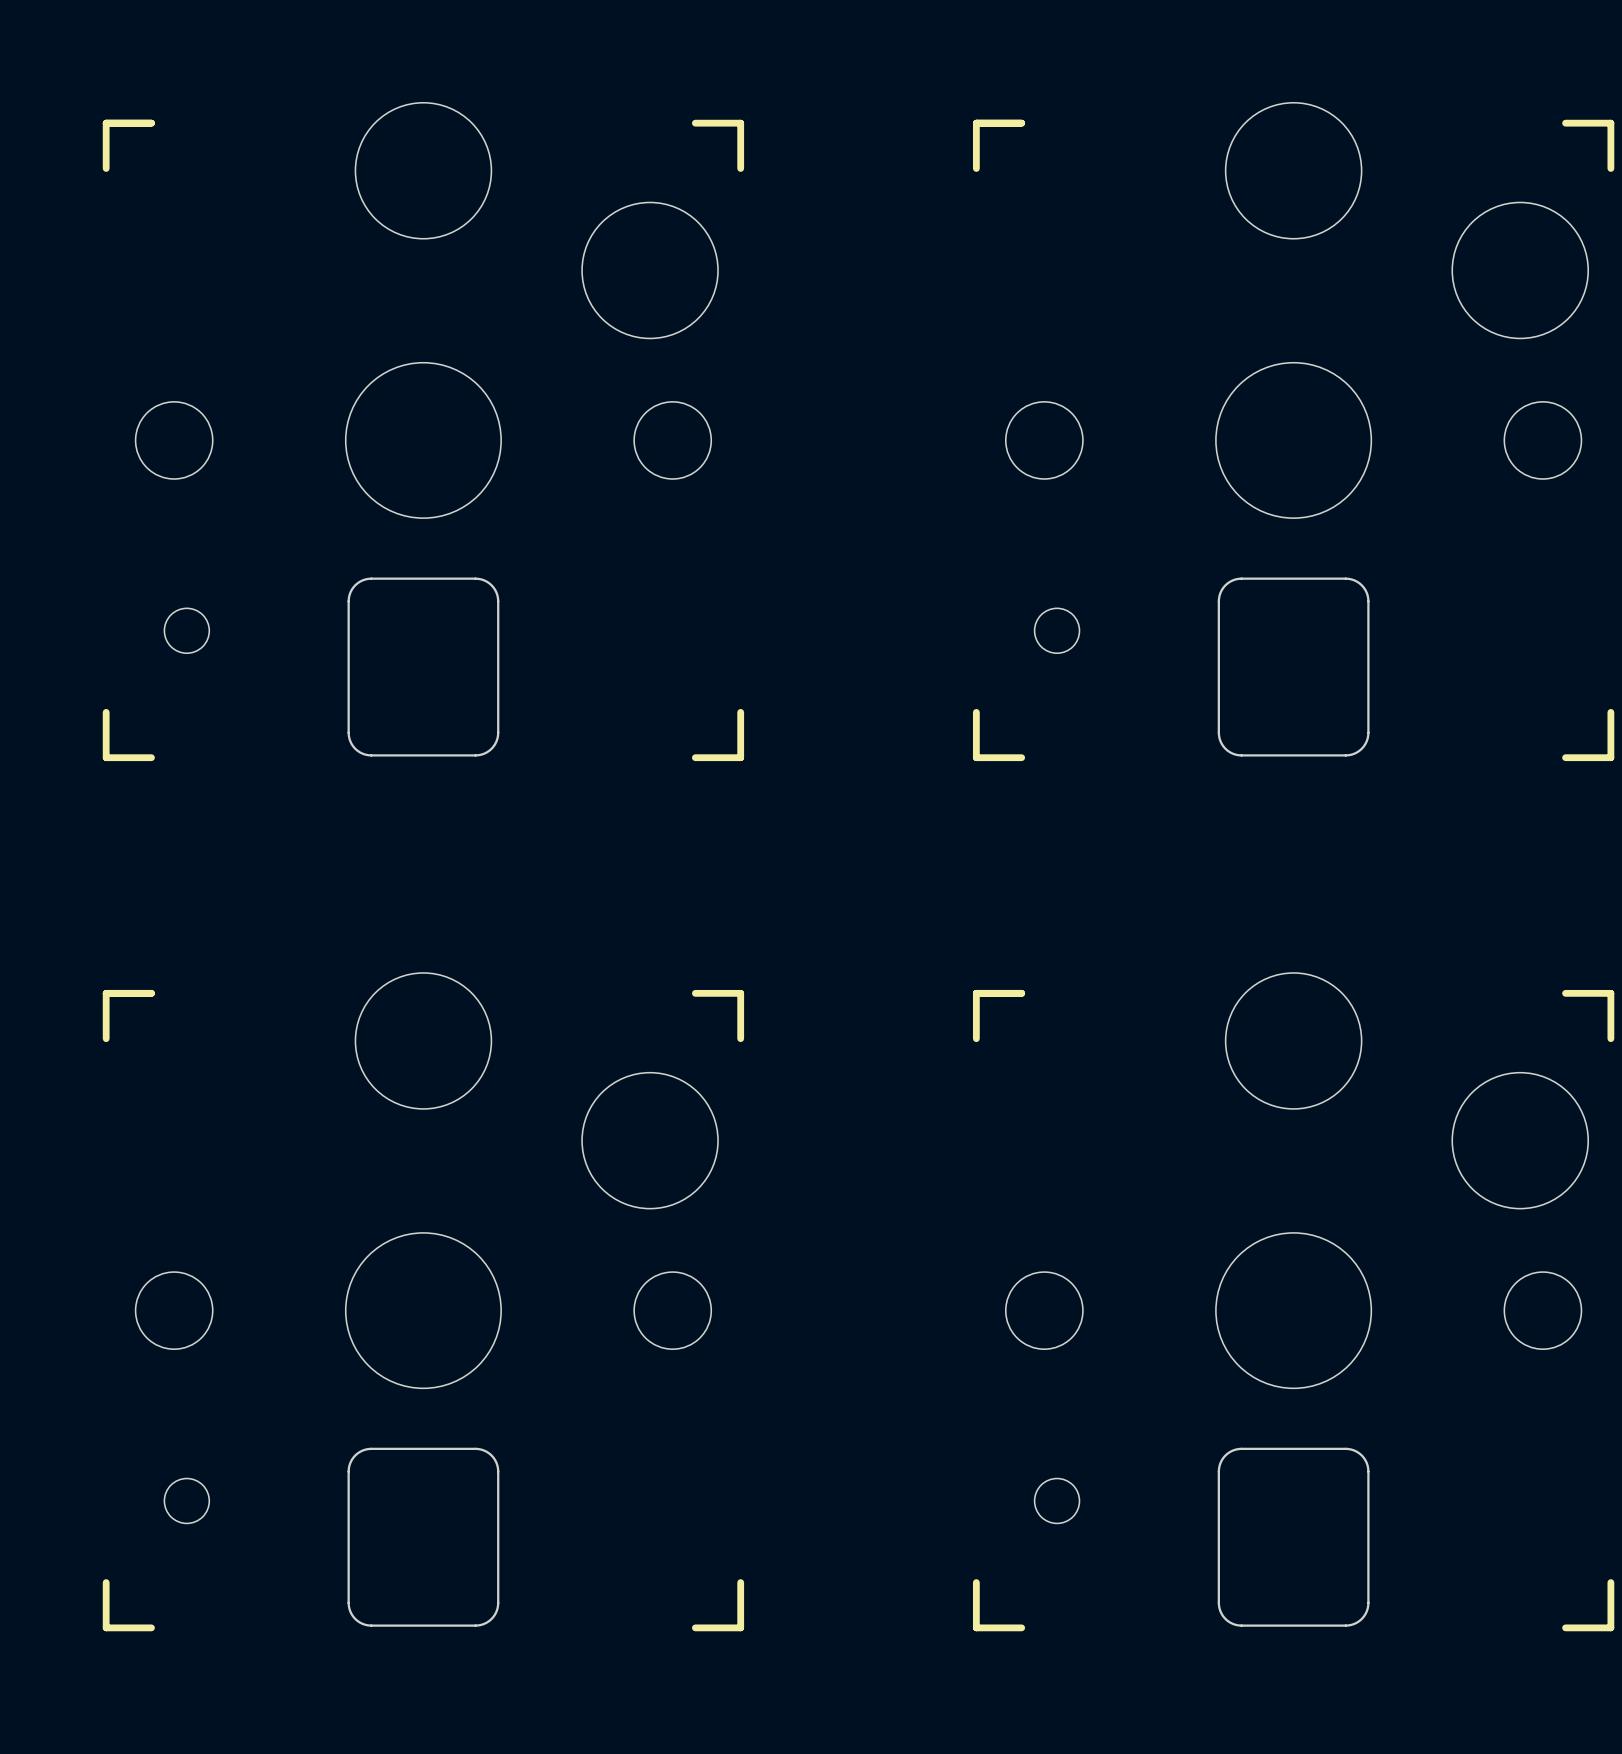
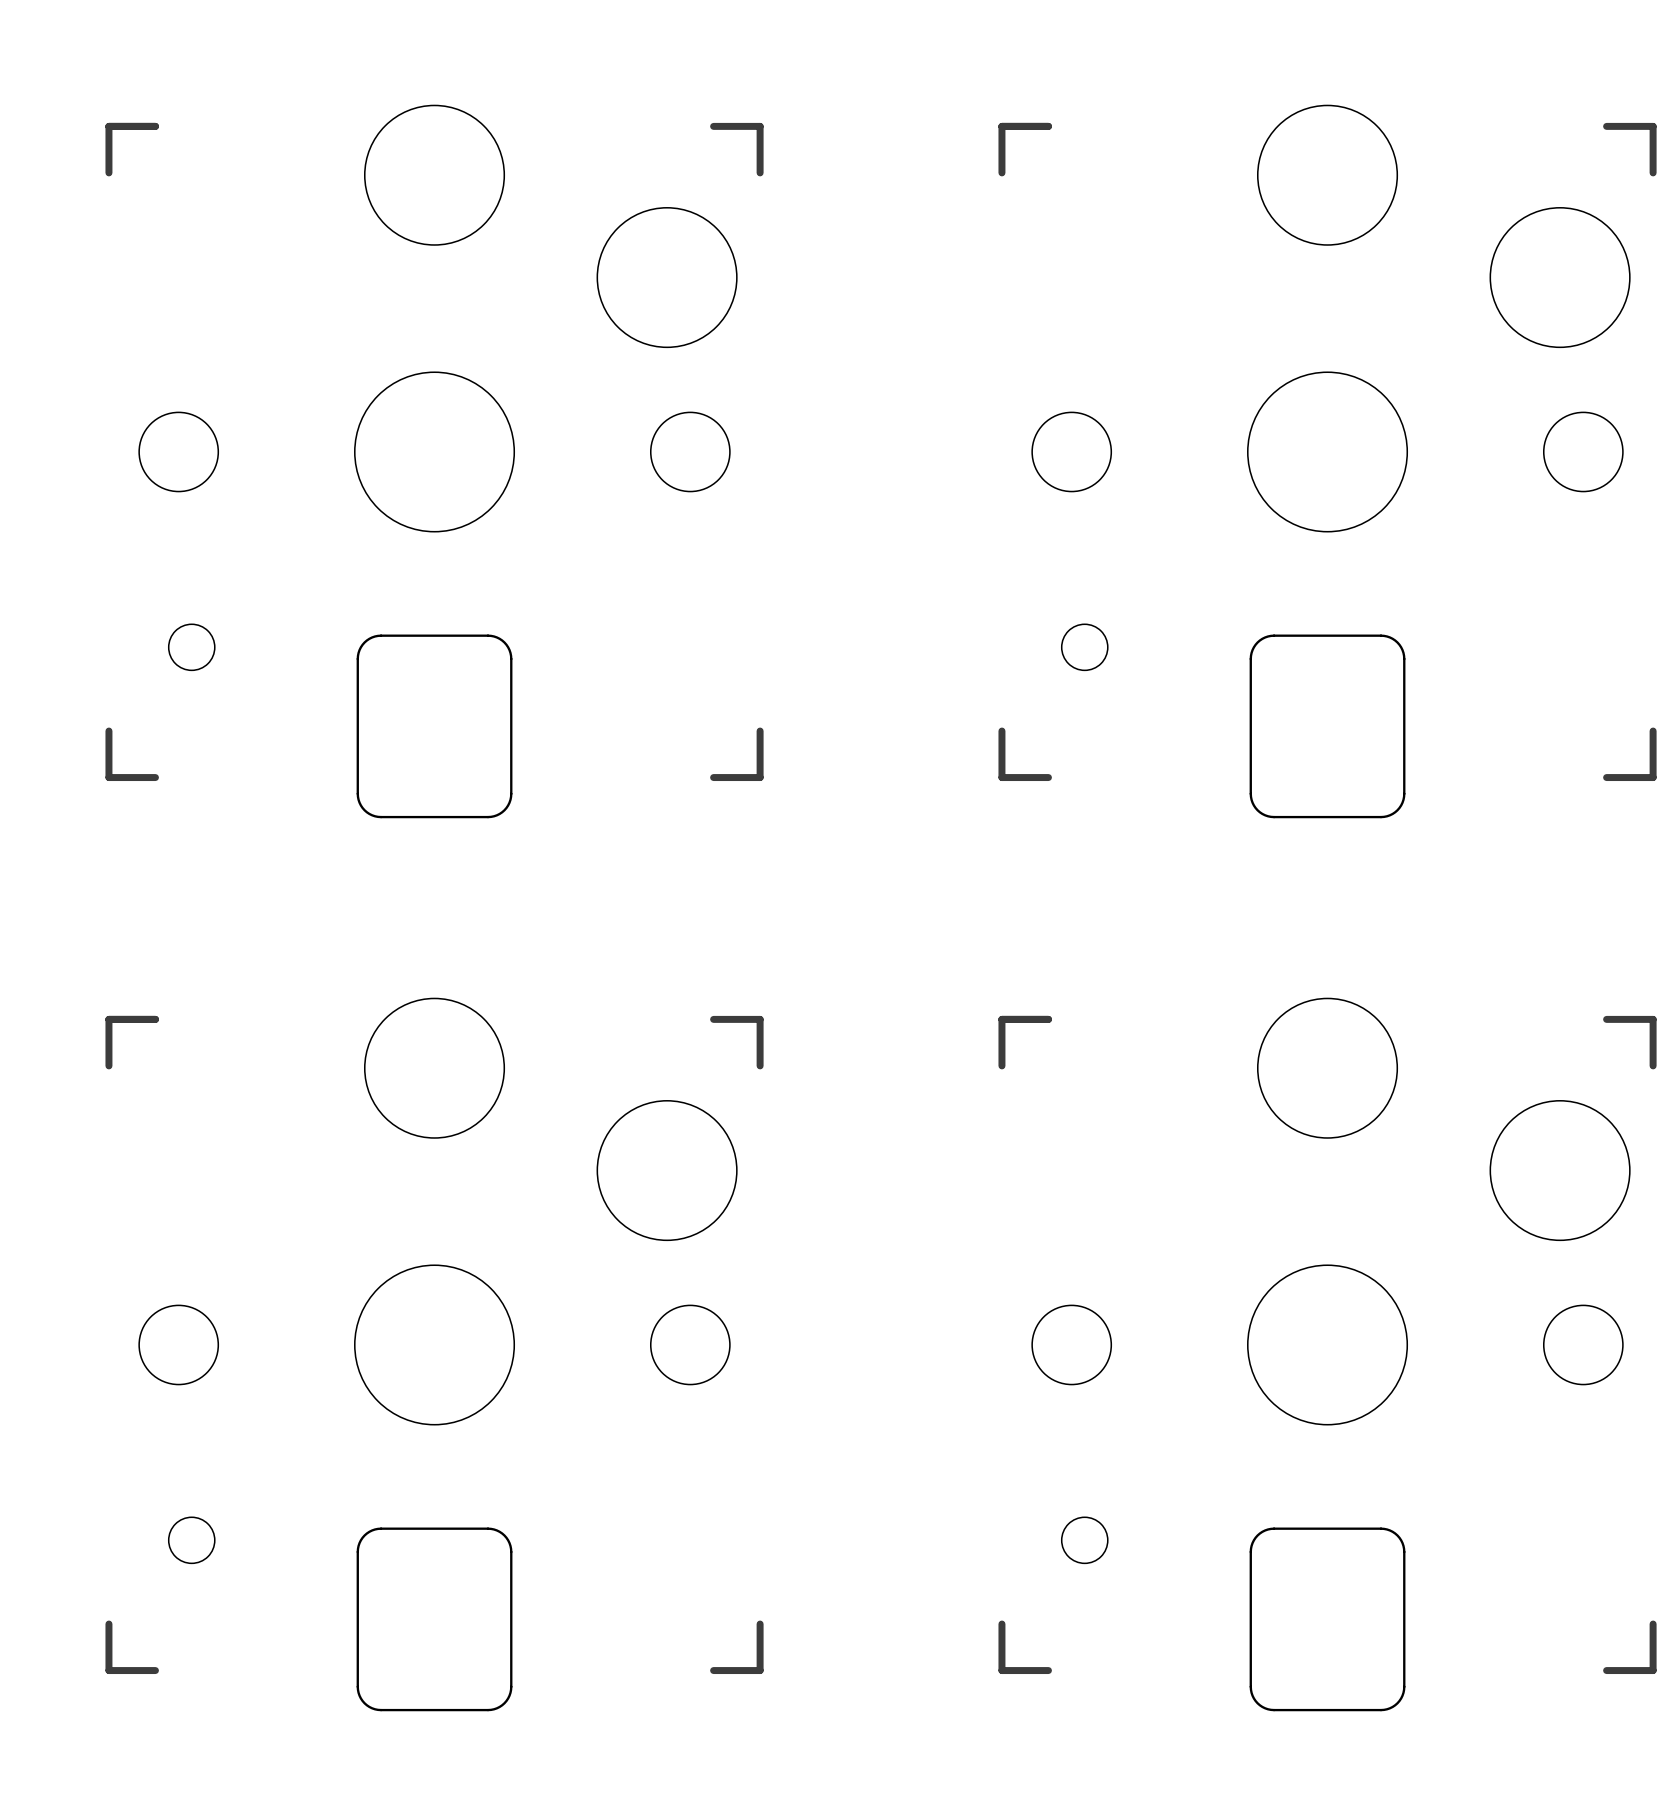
part position: (423, 667) -> (434, 726)
part position: (1293, 667) -> (1327, 726)
part position: (423, 1537) -> (434, 1619)
part position: (1293, 1537) -> (1327, 1619)

